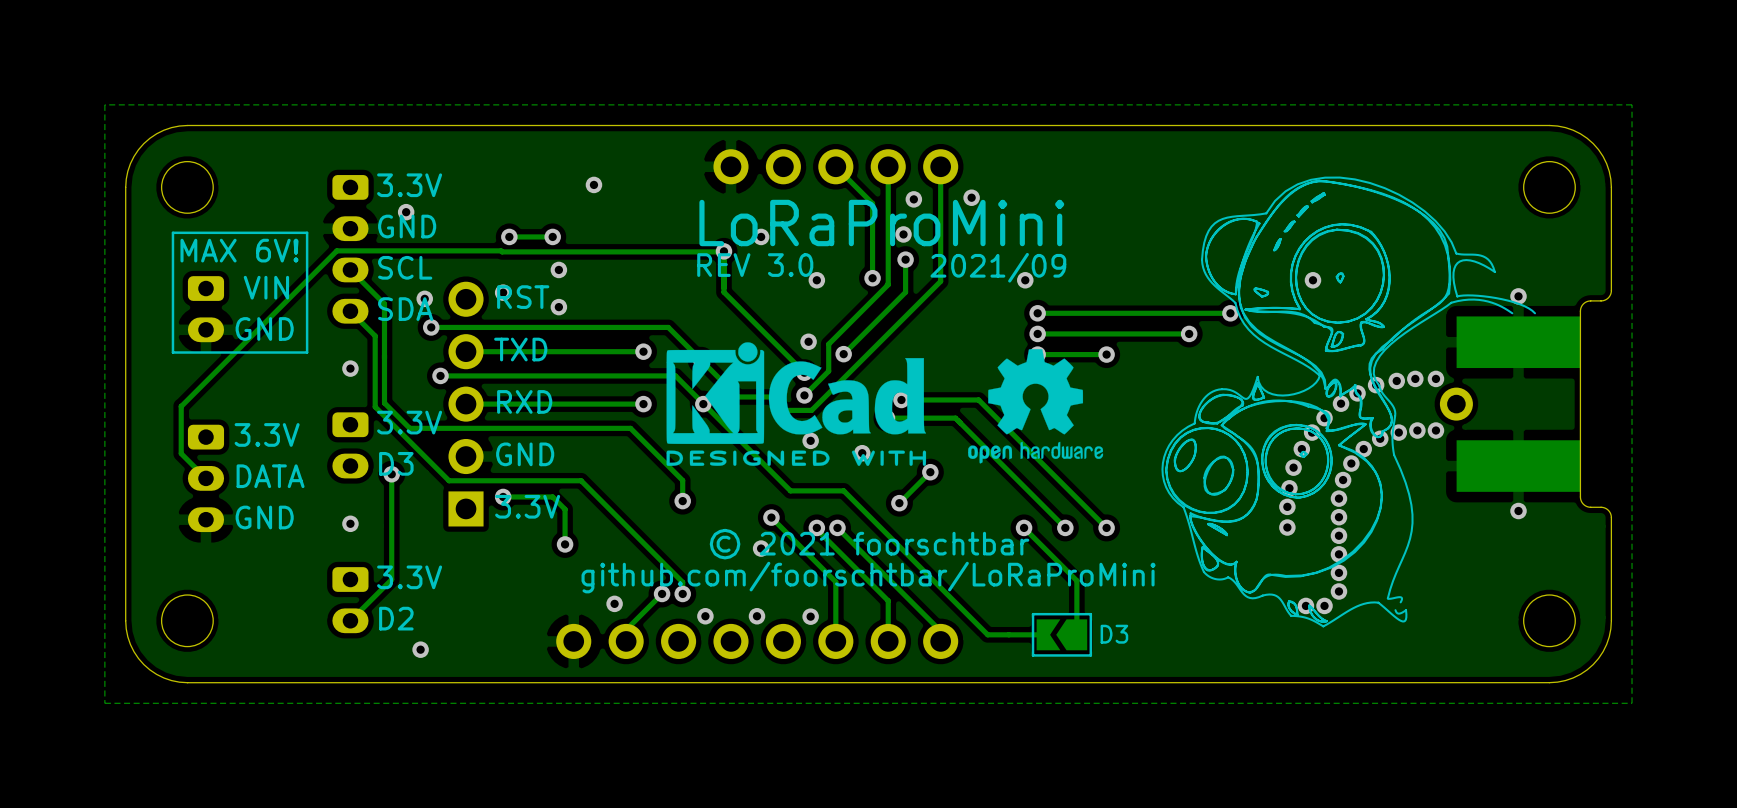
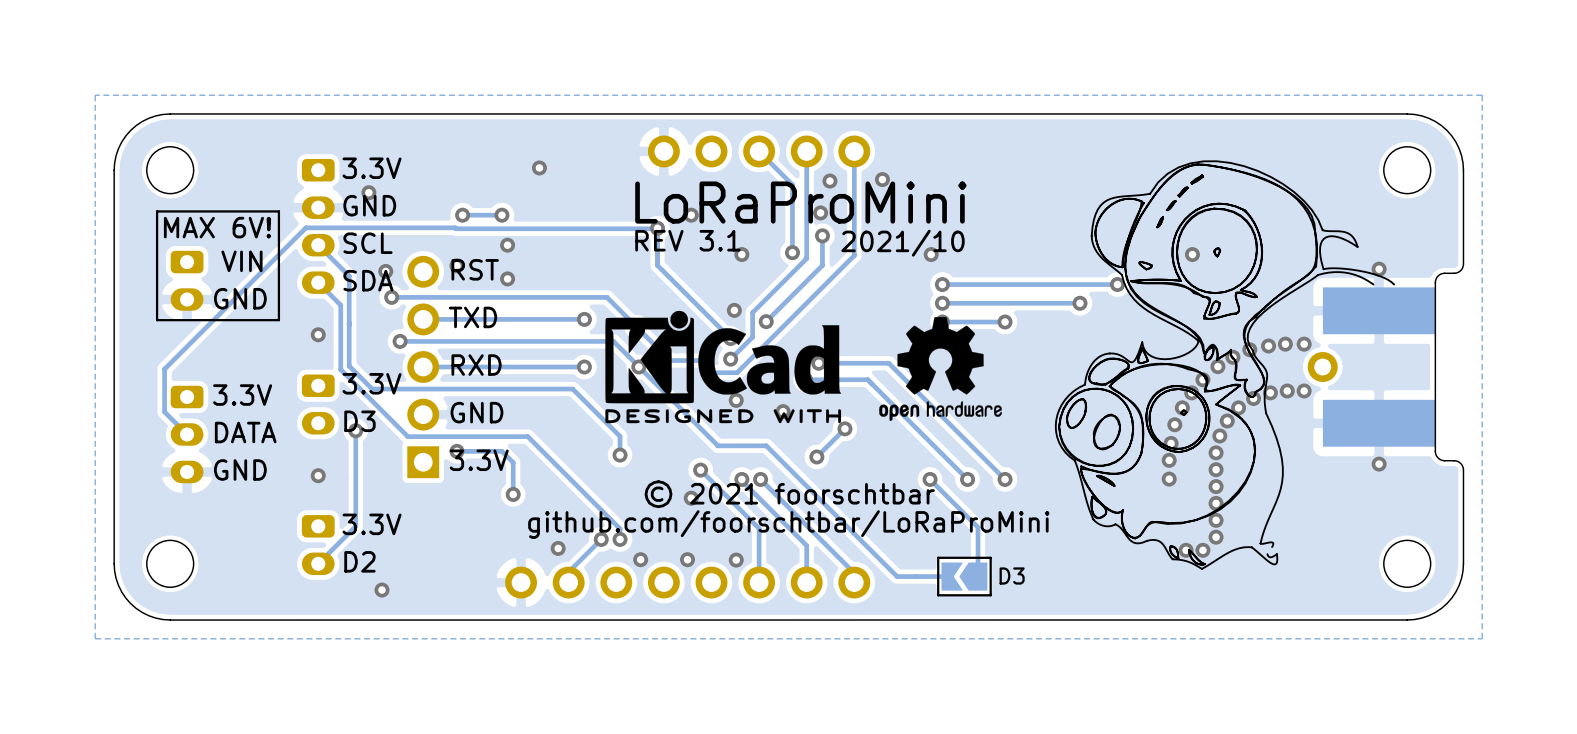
text: REV 3.0 (755, 265) -> REV 3.1 (687, 240)
text: 2021/09 (998, 267) -> 2021/10 (902, 243)

